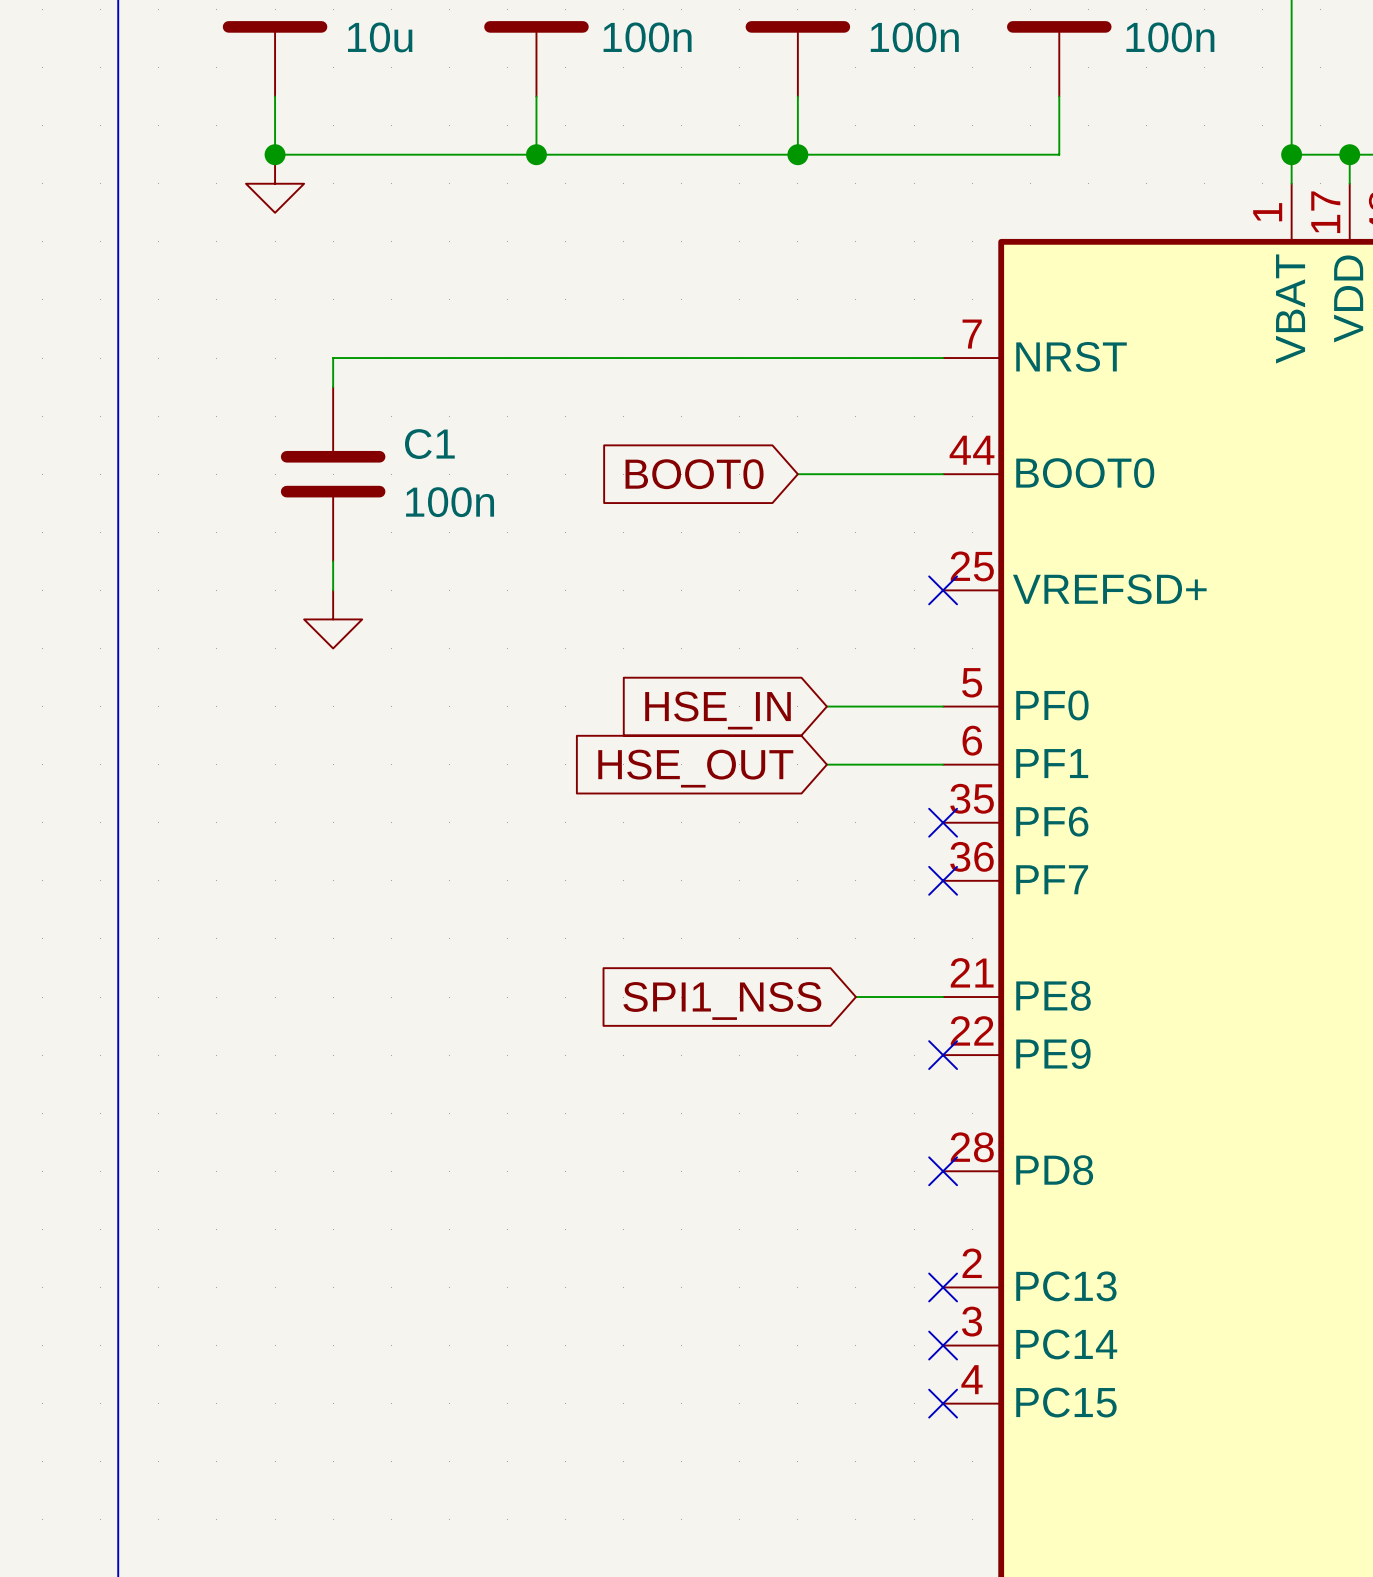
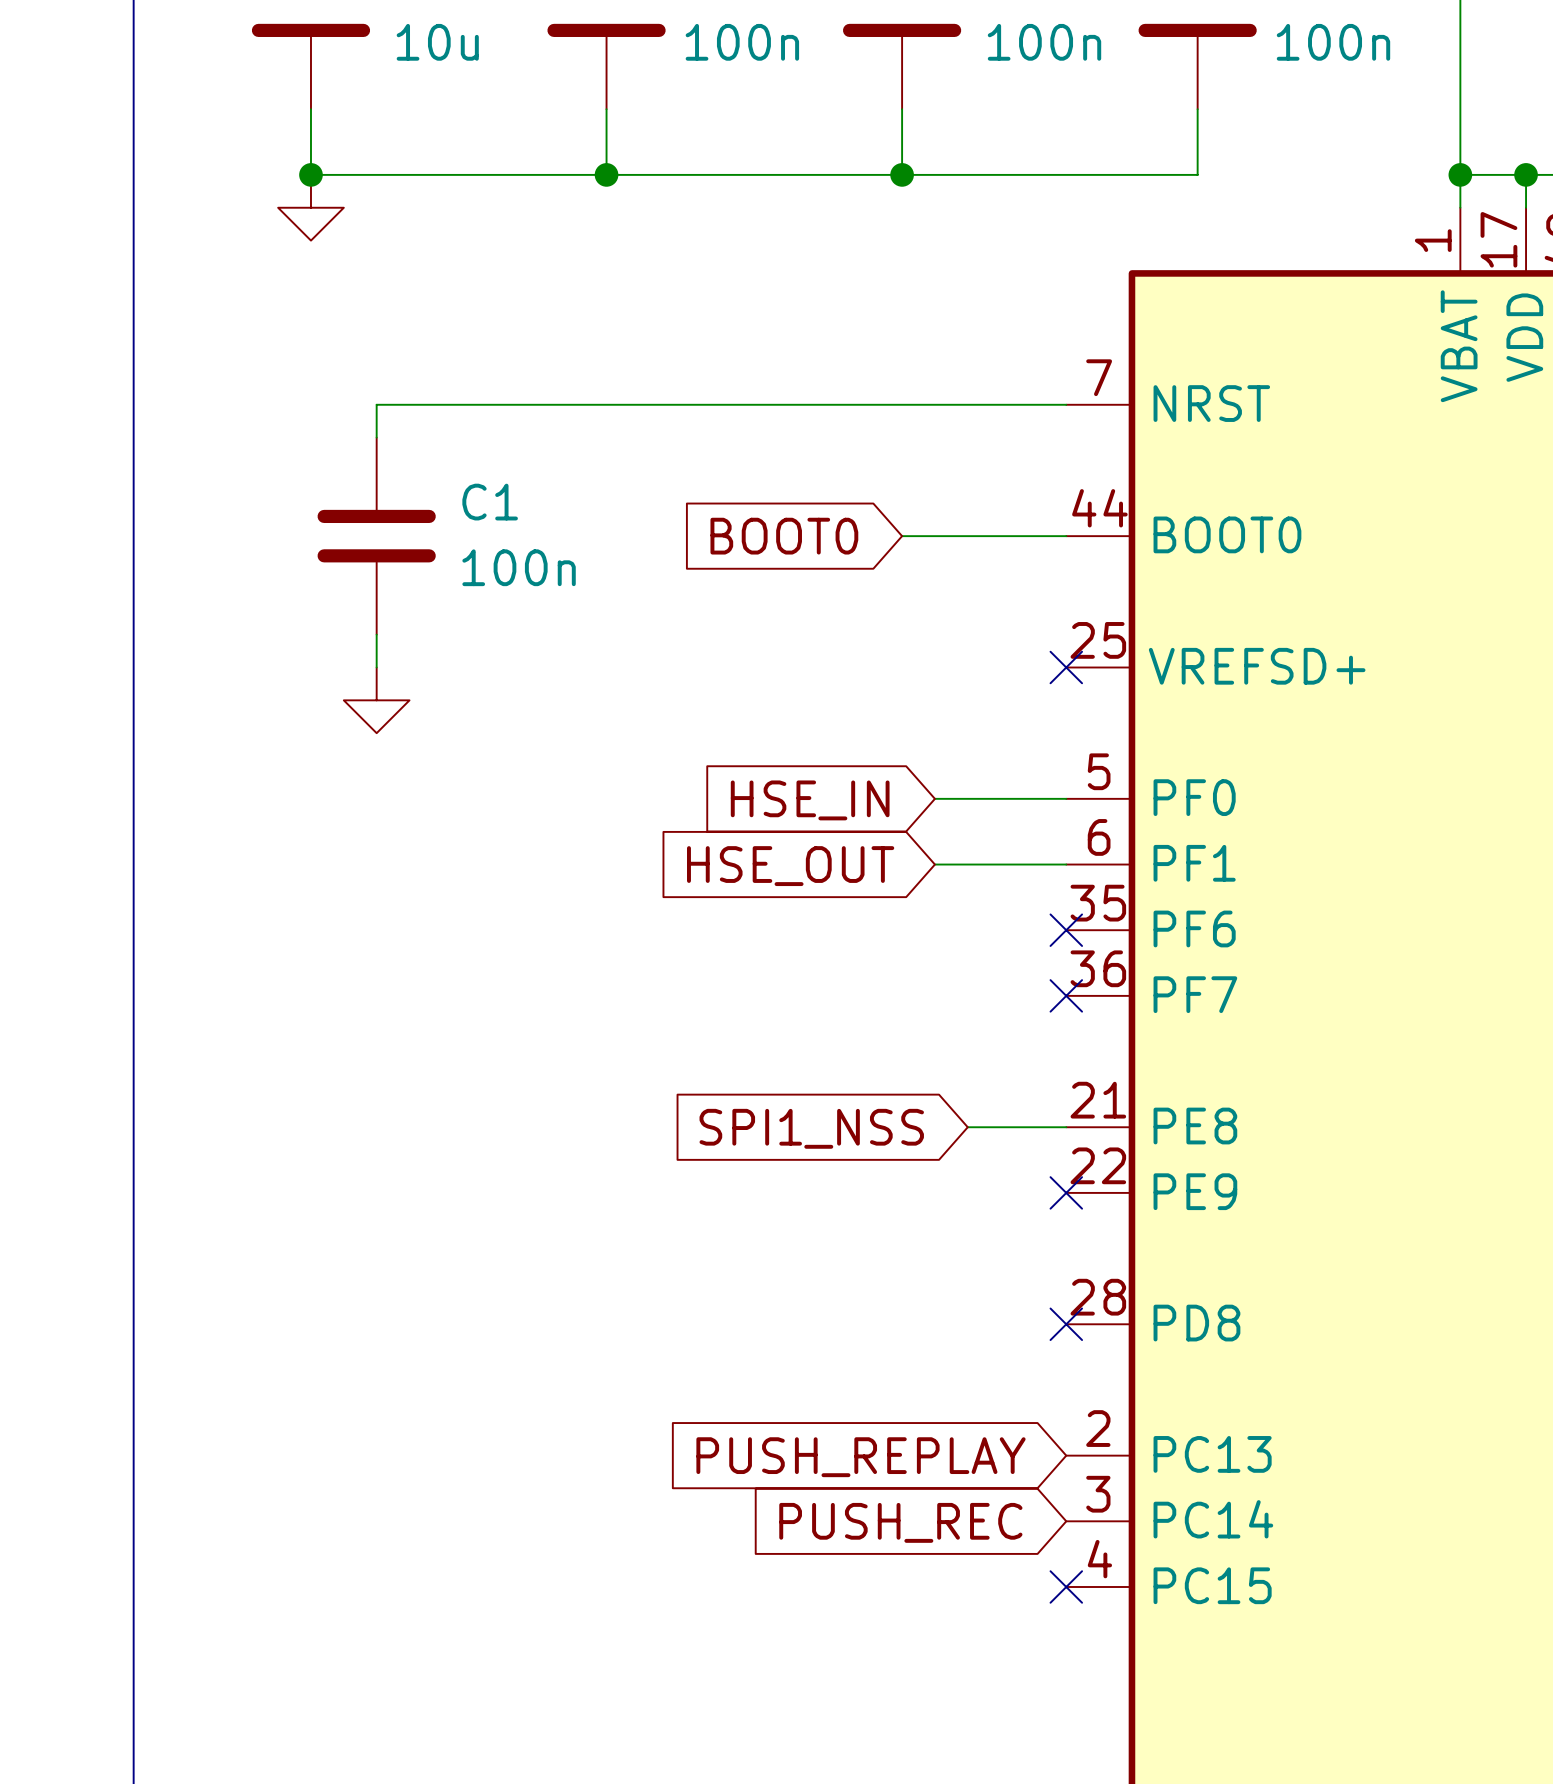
no-connect mark: (943, 1287) -> none
global label: none -> PUSH_REPLAY (860, 1457)
no-connect mark: (943, 1345) -> none
global label: none -> PUSH_REC (900, 1522)

